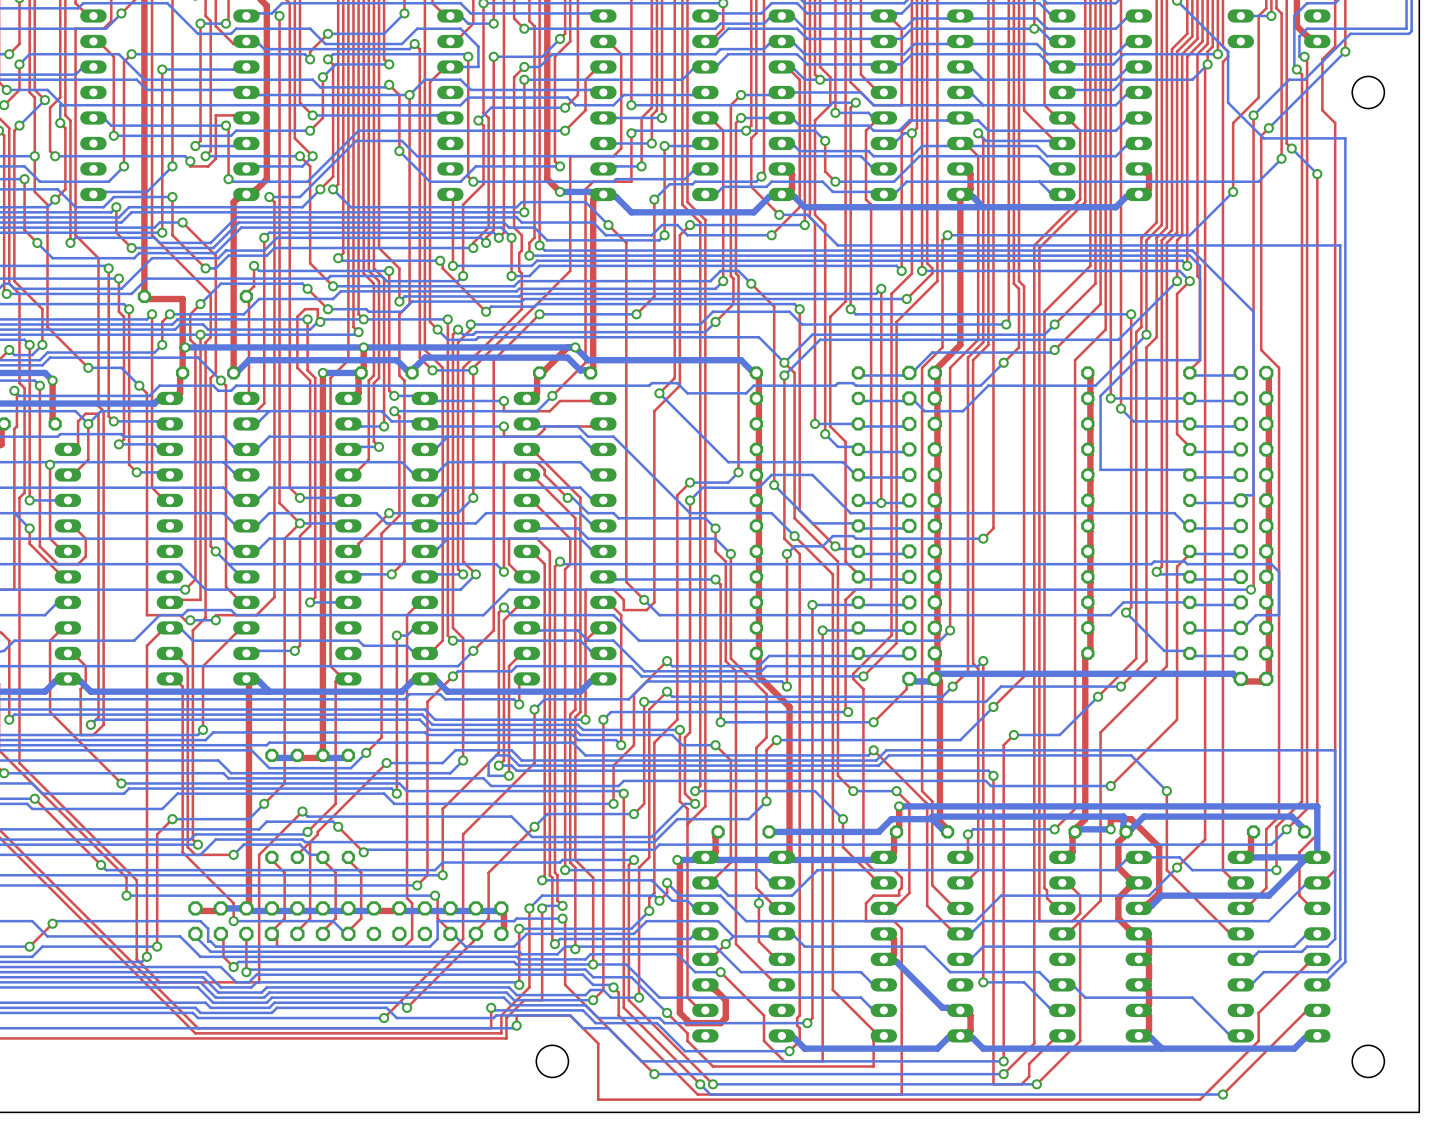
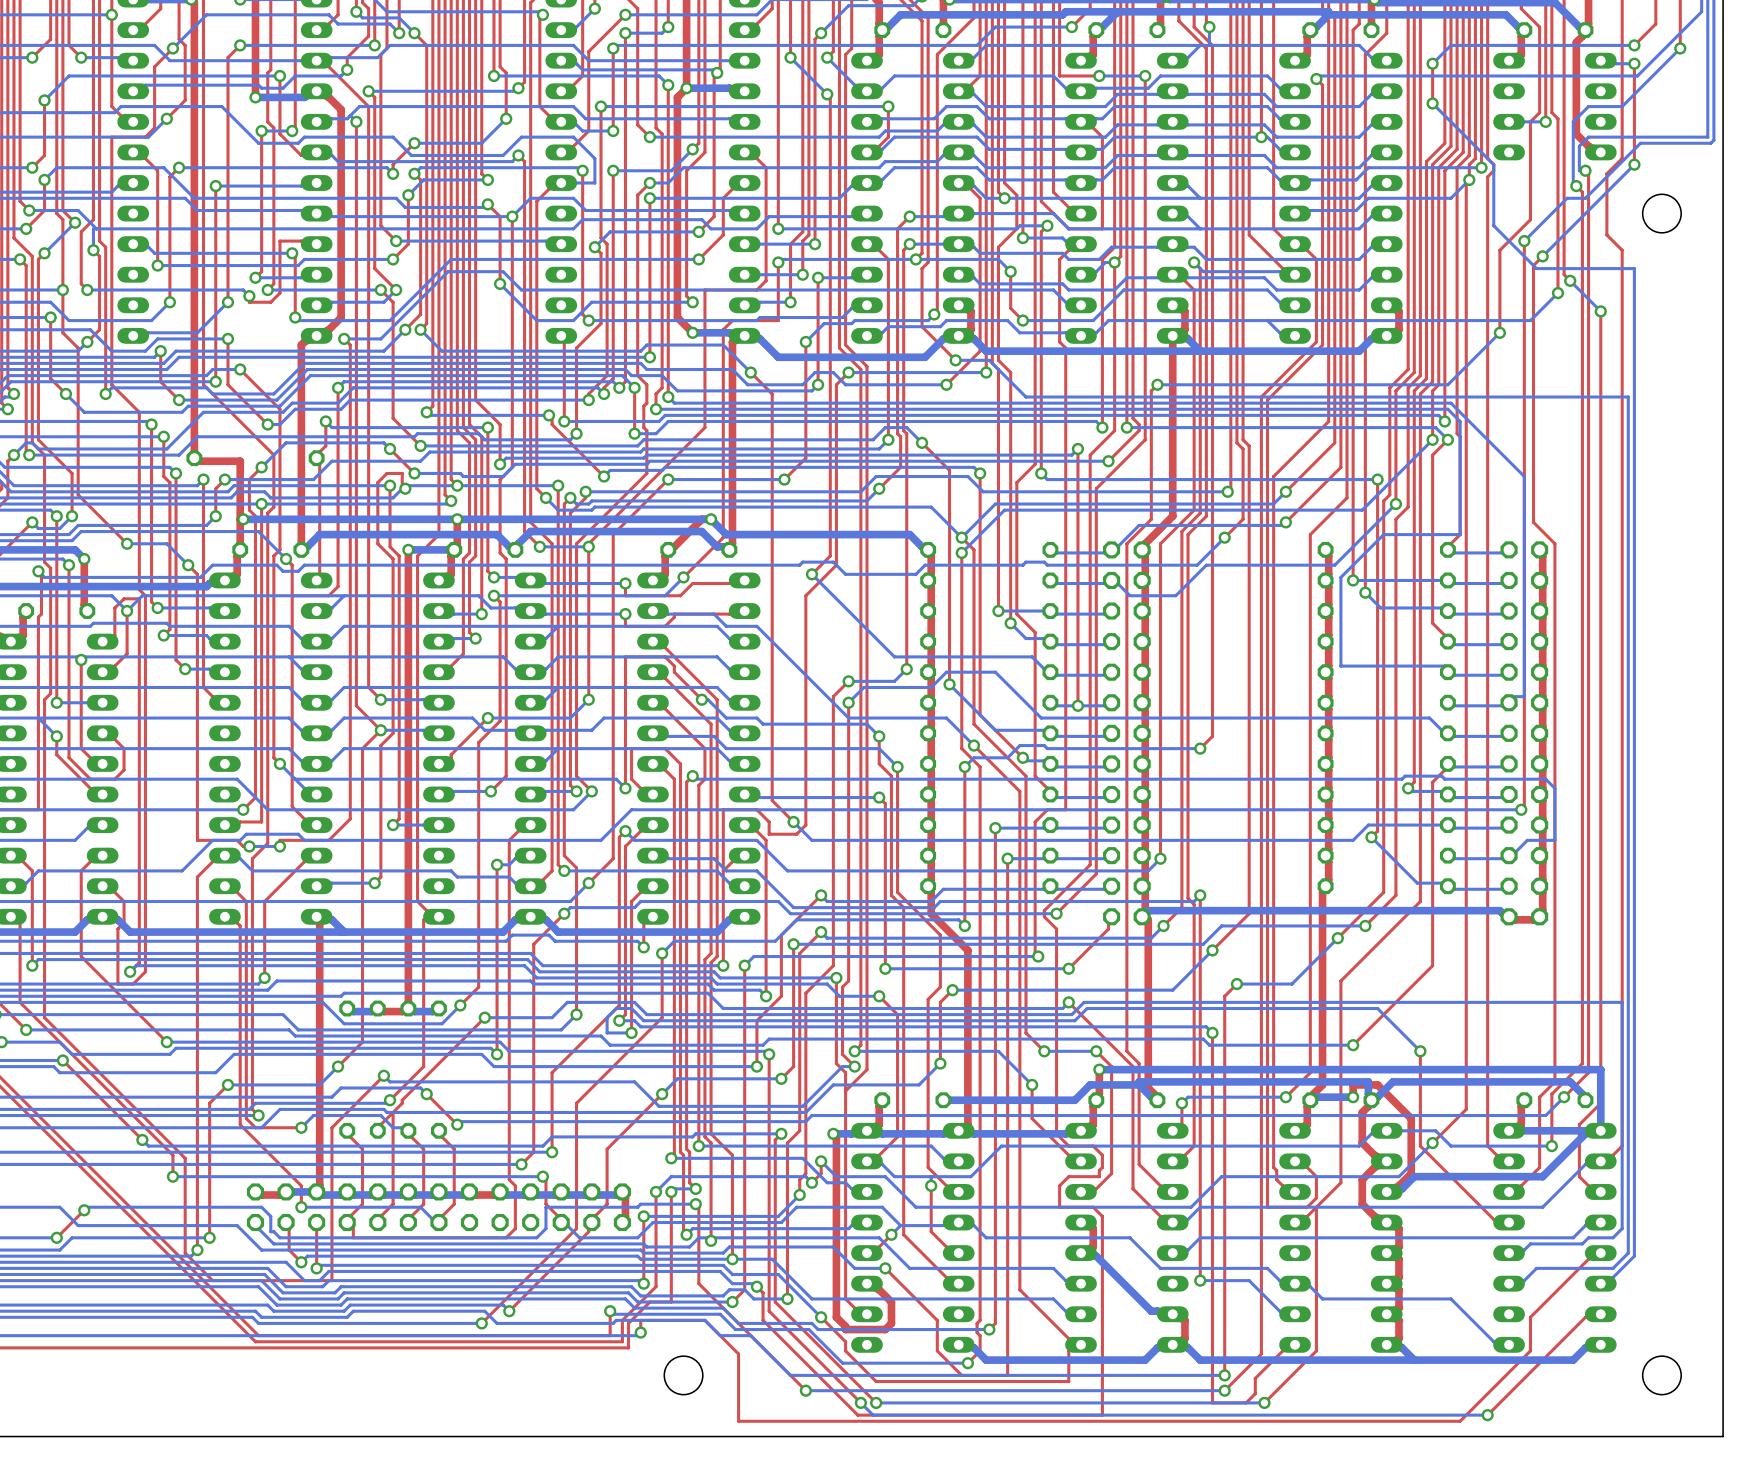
bottom track: (934, 678) (929, 681) (914, 681) -> none

